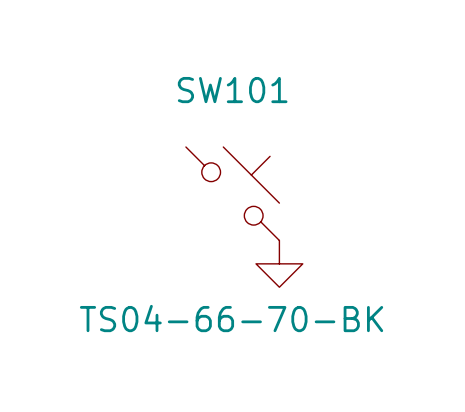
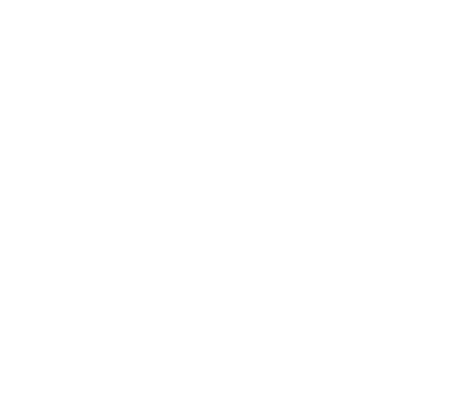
SW101: TS04-66-70-BK (232, 193) -> none
power symbol: (279, 263) -> none

